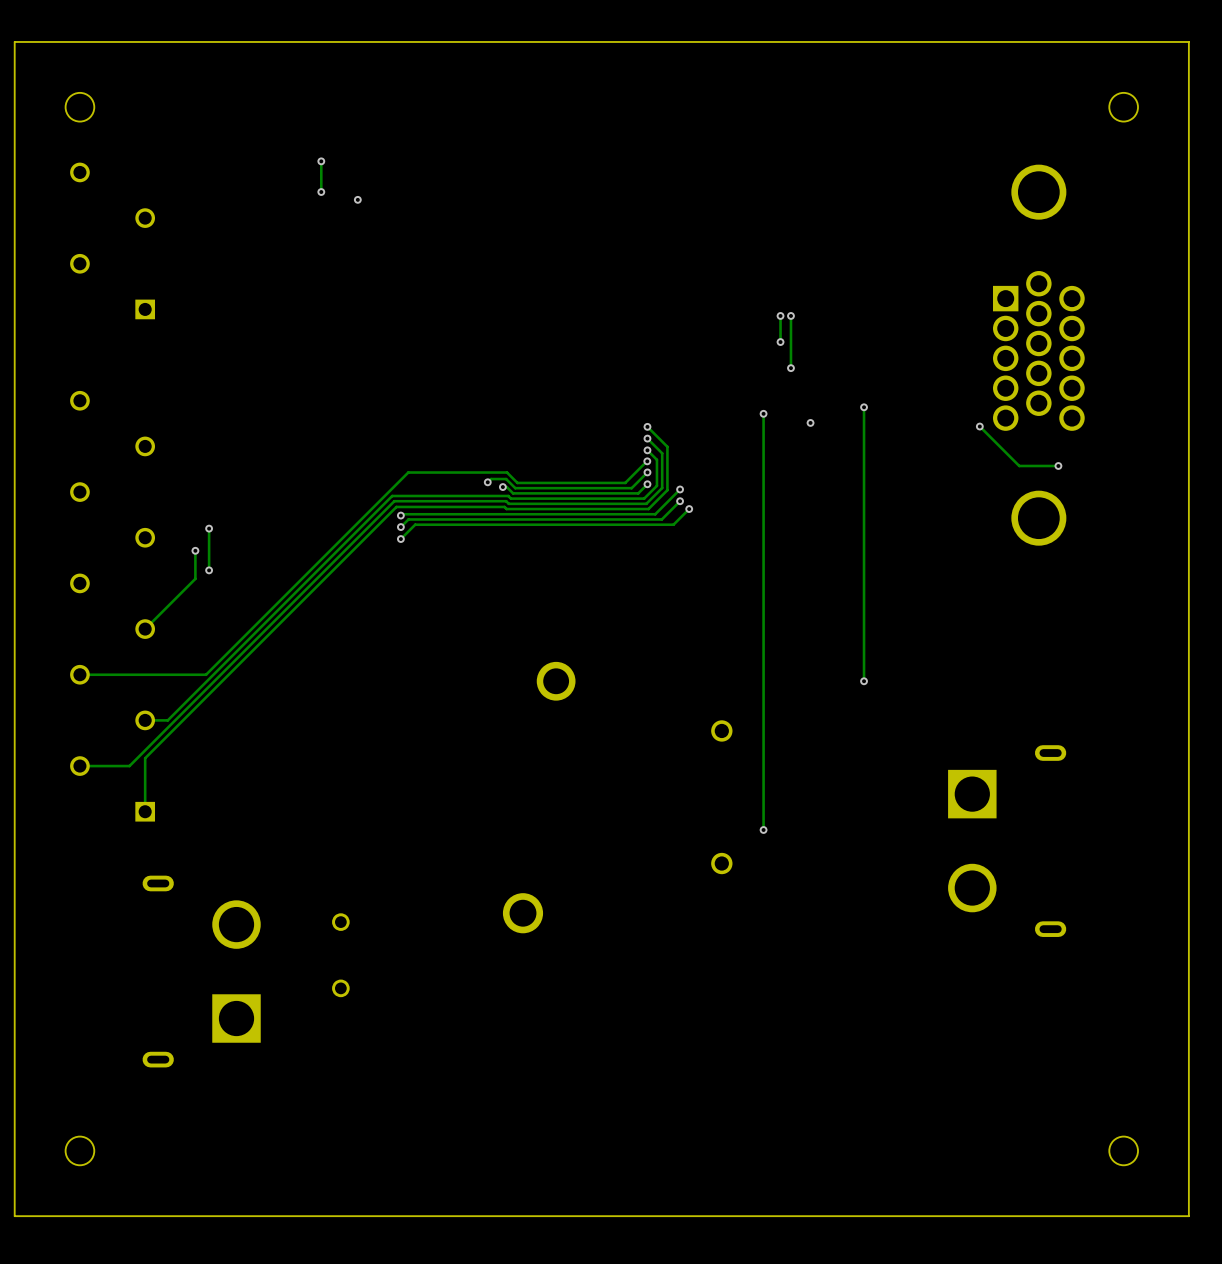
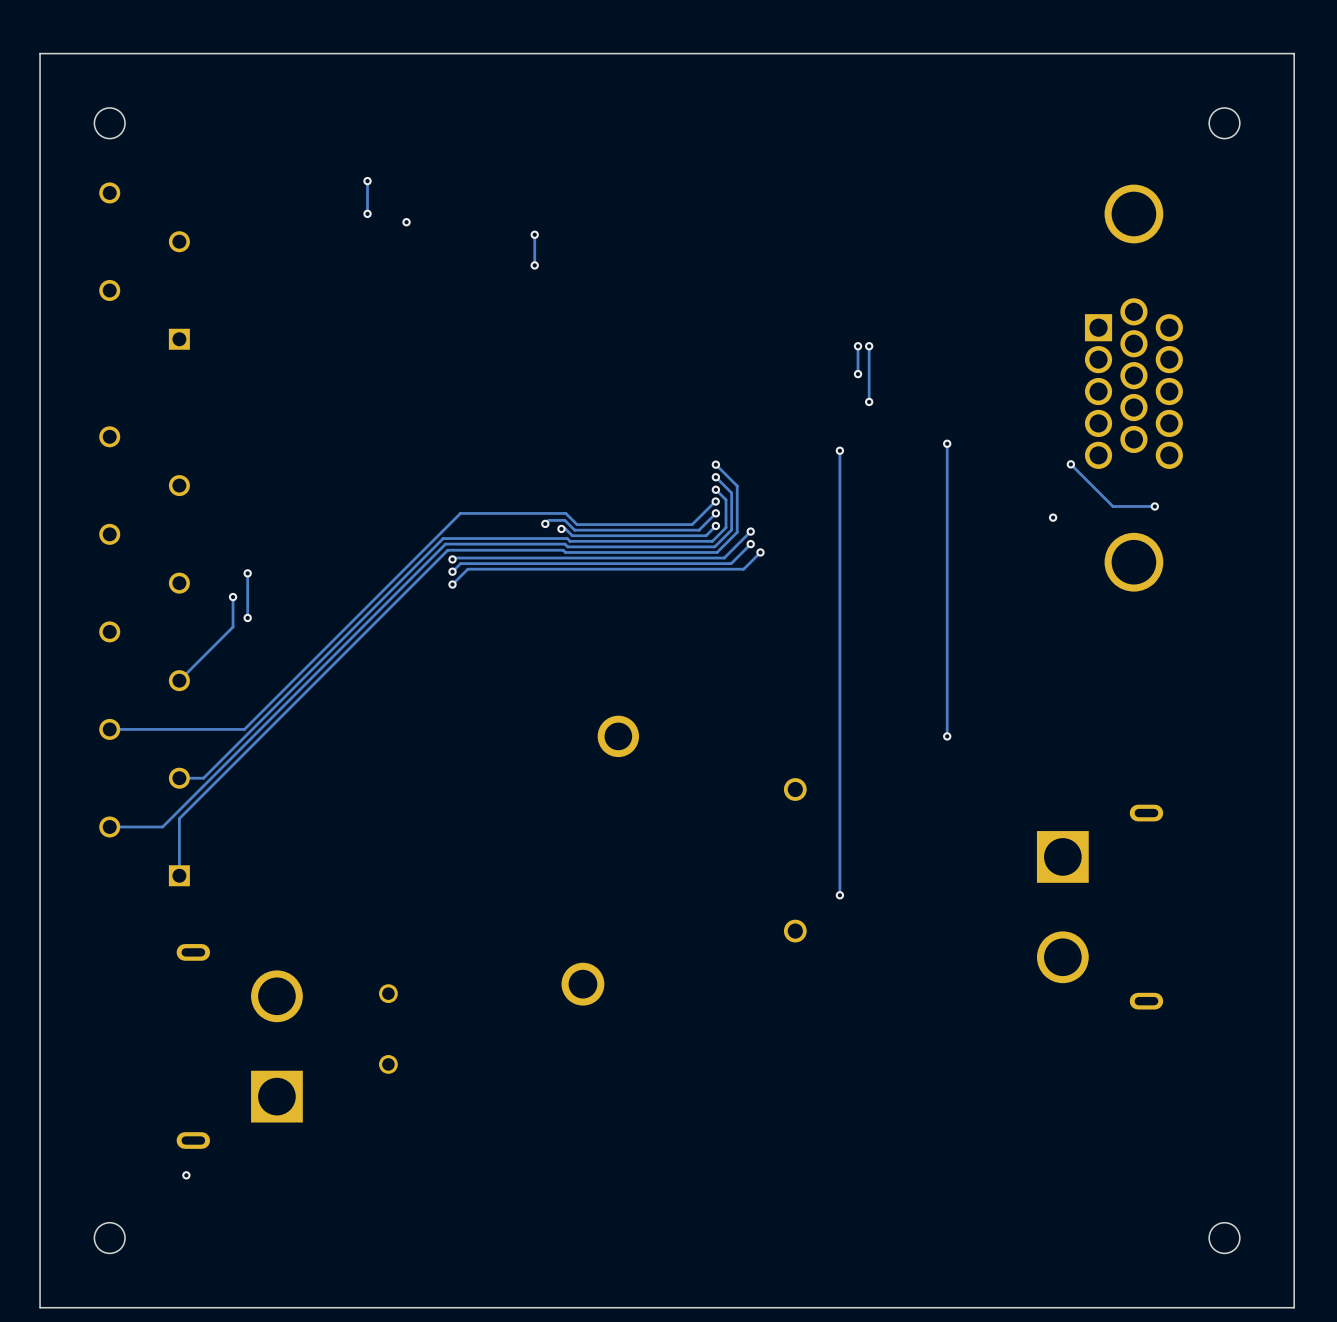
track: none -> (534, 234) (534, 265)
via: none -> (534, 234)
via: none -> (534, 265)
via: (810, 422) -> none
via: none -> (1053, 517)
via: none -> (186, 1175)

